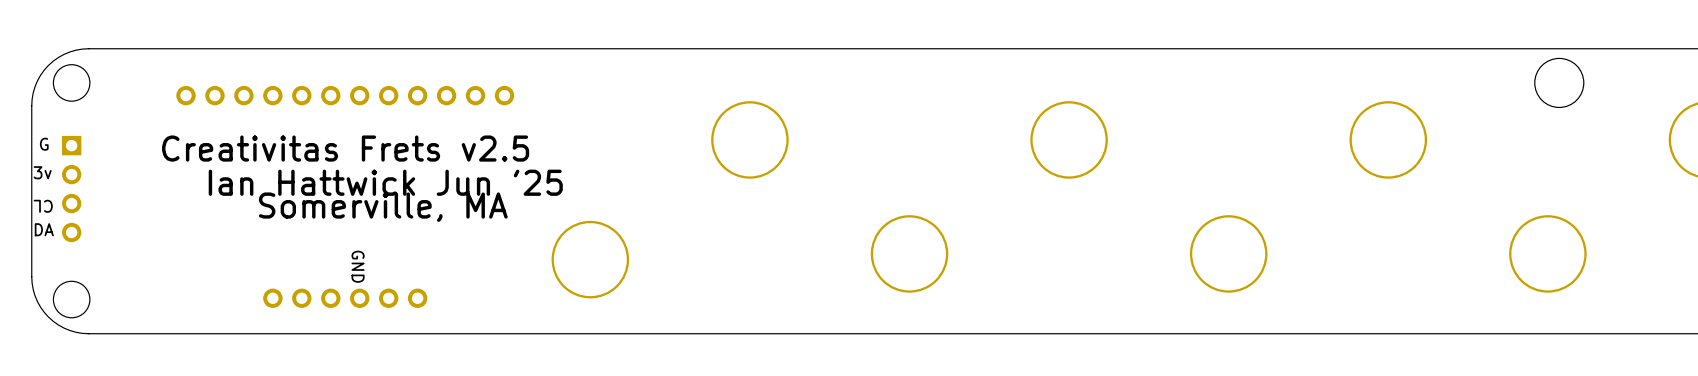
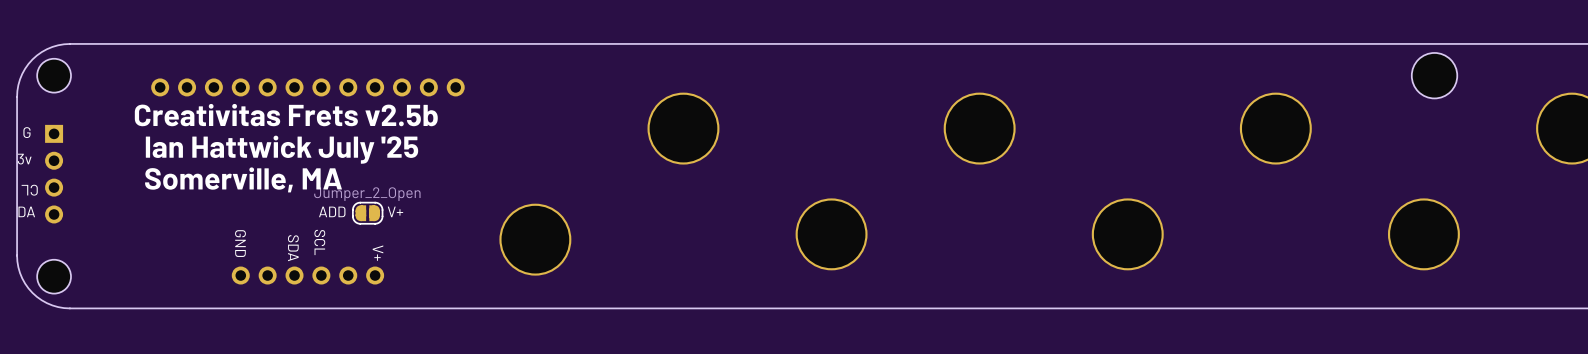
text: Creativitas Frets v2.5 (345, 148) -> Creativitas Frets v2.5b (286, 115)
text: Ian Hattwick Jun '25 (385, 182) -> Ian Hattwick July '25 (282, 149)
text position: Somerville, MA (383, 207) -> Somerville, MA (243, 179)
text: none -> ADD (332, 211)
text: none -> V+ (395, 211)
part: none -> Jumper_2_Open (367, 213)
text: none -> GND (240, 243)
text: GND (358, 266) -> SCL (319, 242)
text: none -> SDA (293, 248)
text: none -> V+ (378, 253)

